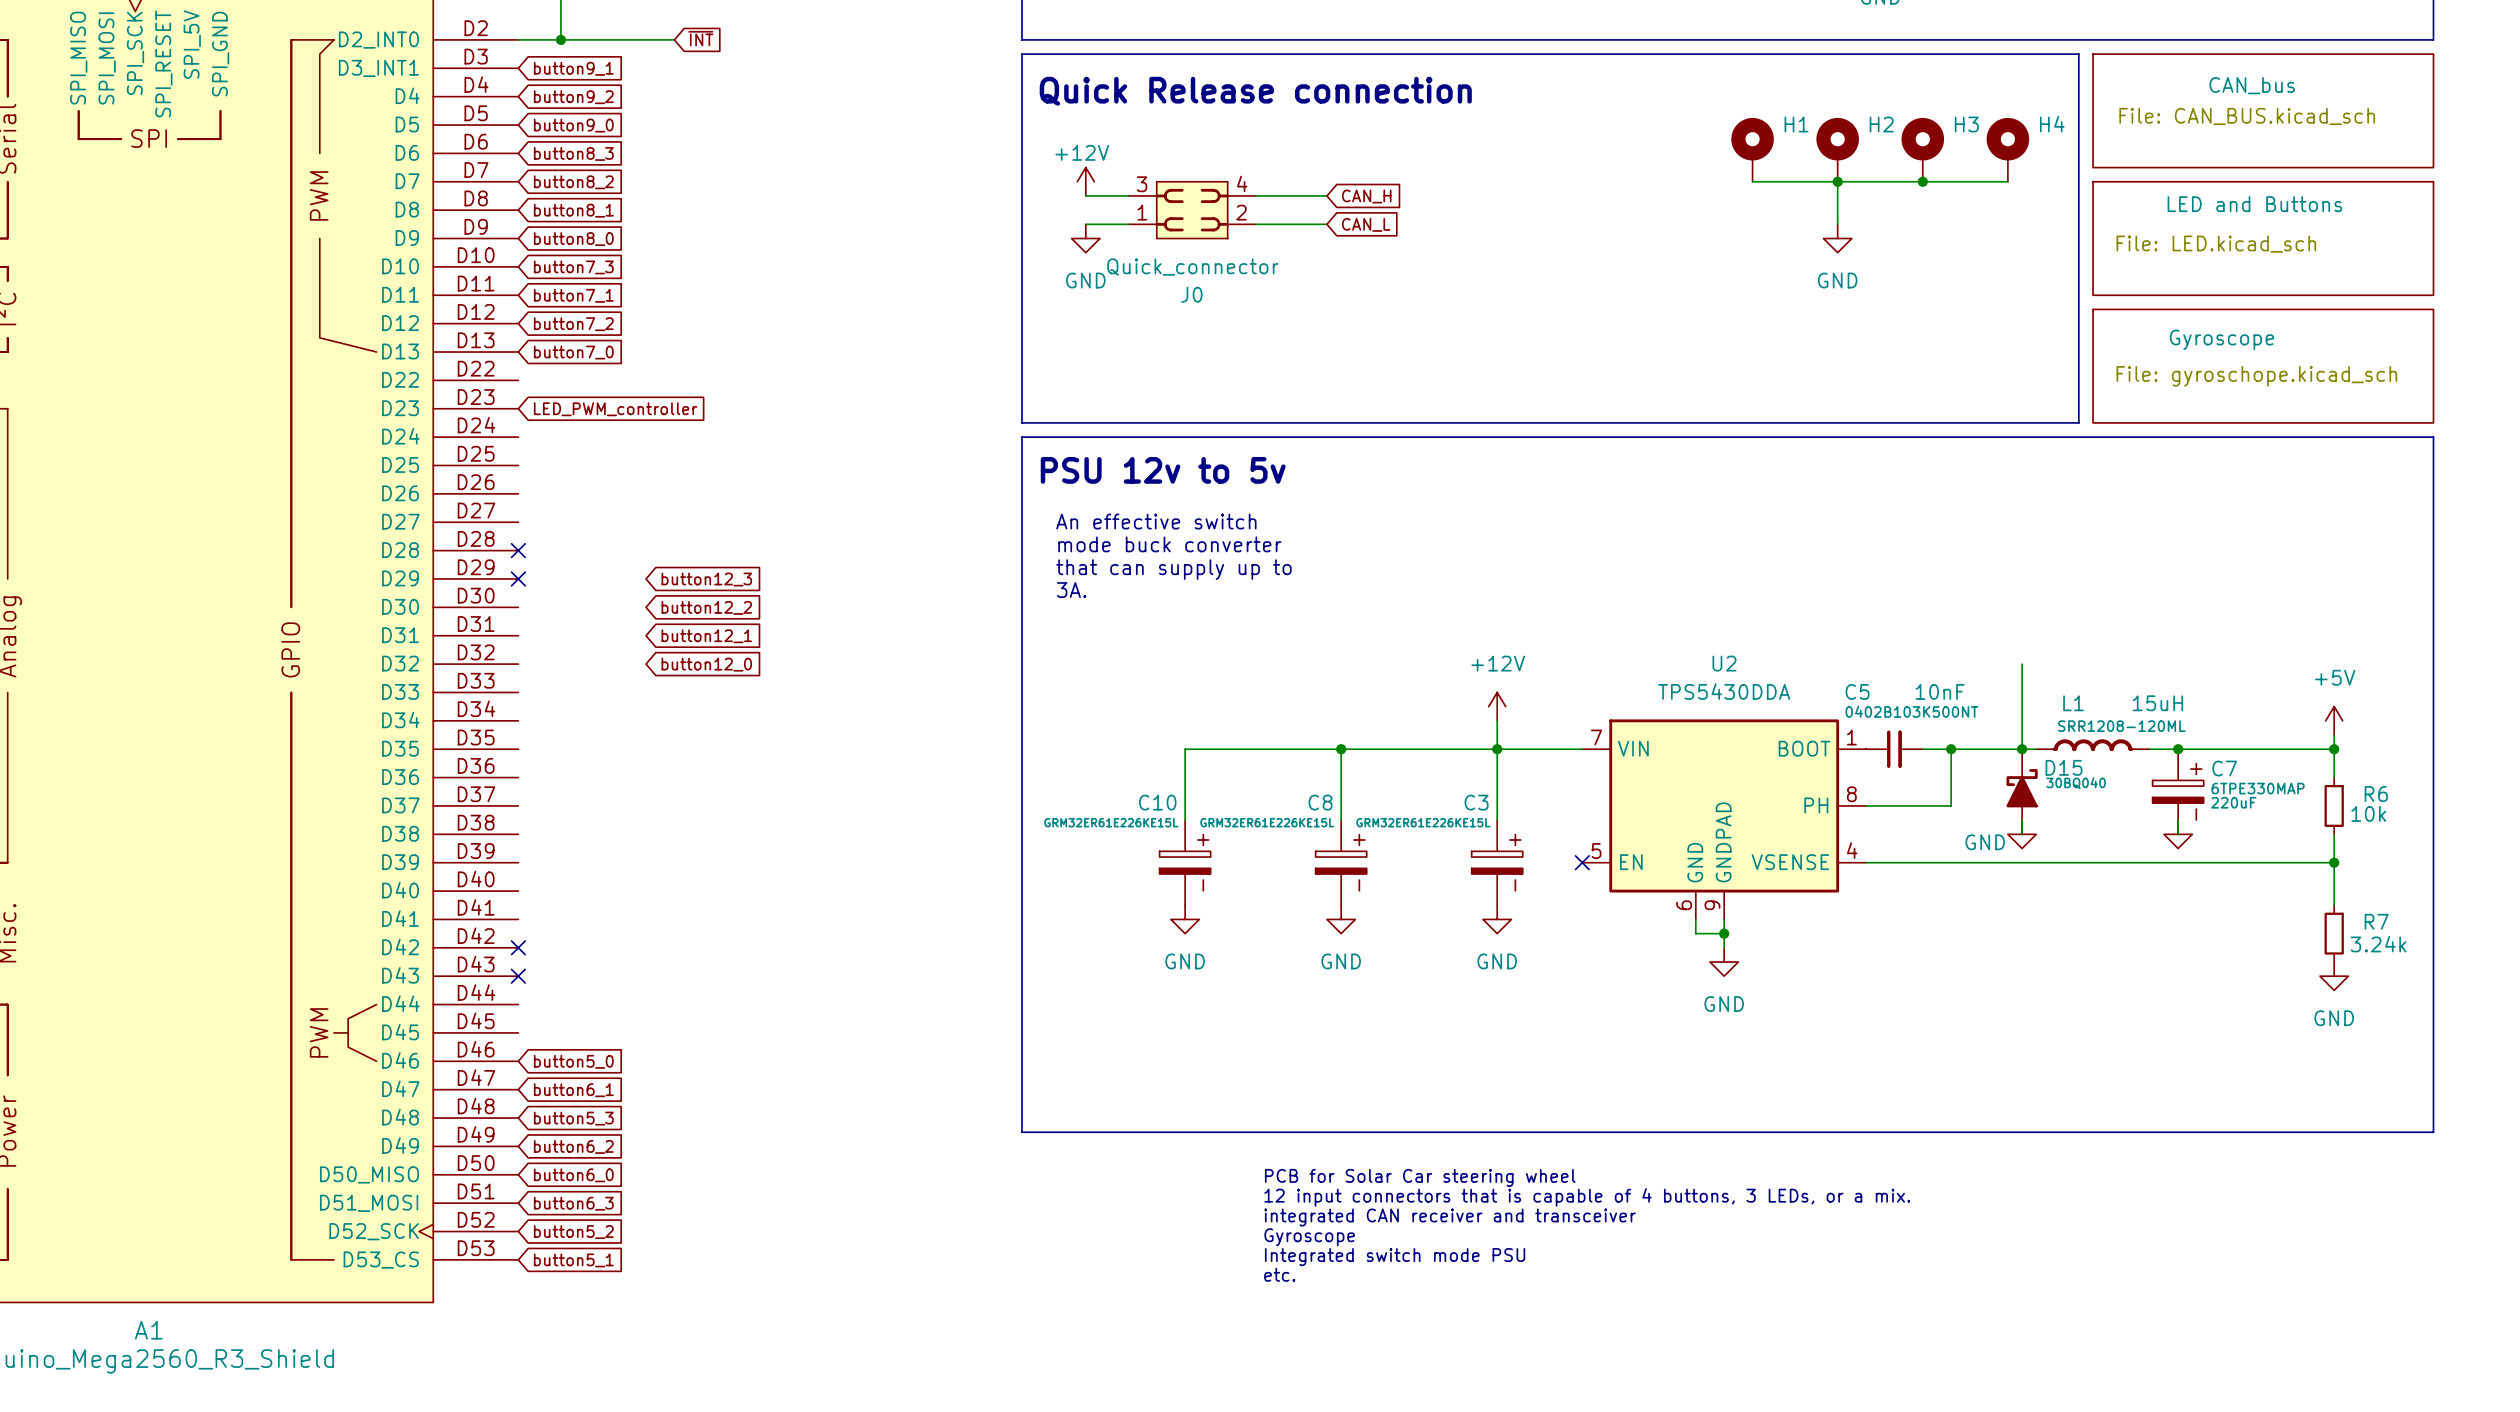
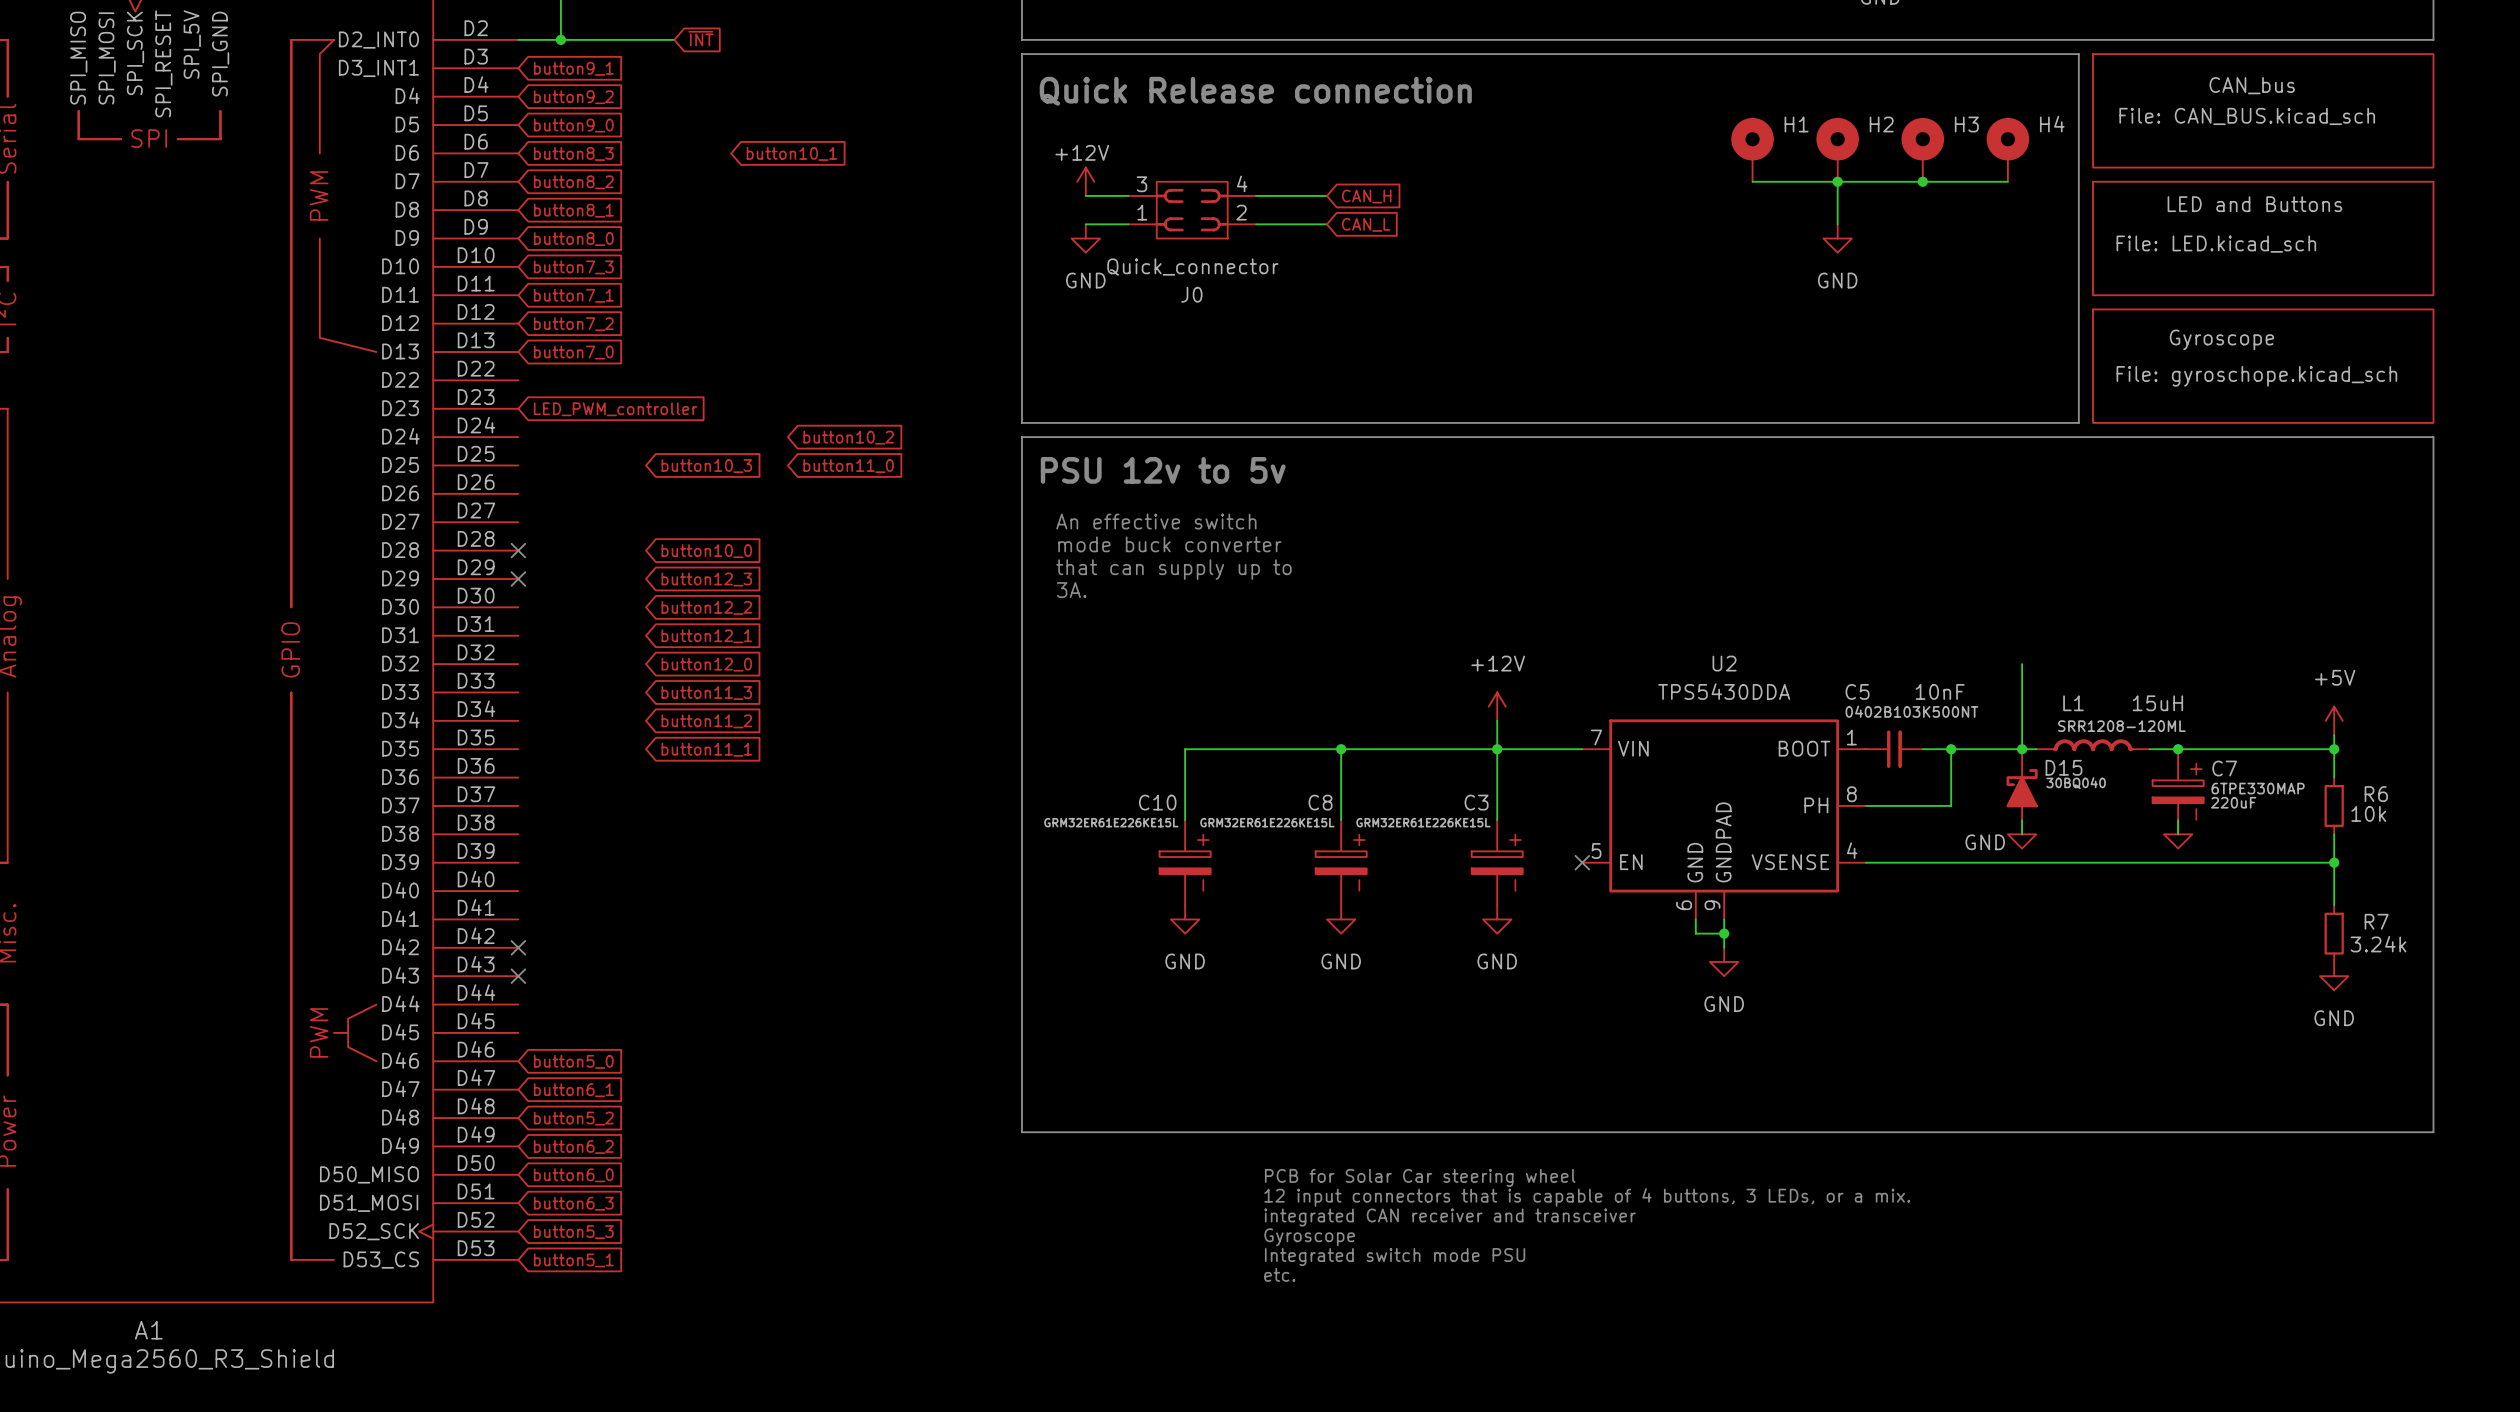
global label: none -> button10_1 (791, 153)
global label: none -> button10_2 (848, 437)
global label: none -> button10_3 (706, 466)
global label: none -> button11_0 (848, 466)
global label: none -> button10_0 (706, 551)
global label: none -> button11_3 (706, 693)
global label: none -> button11_2 (706, 721)
global label: none -> button11_1 (706, 749)
global label: button5_3 (573, 1118) -> button5_2 (573, 1118)
global label: button5_2 (573, 1232) -> button5_3 (573, 1232)

